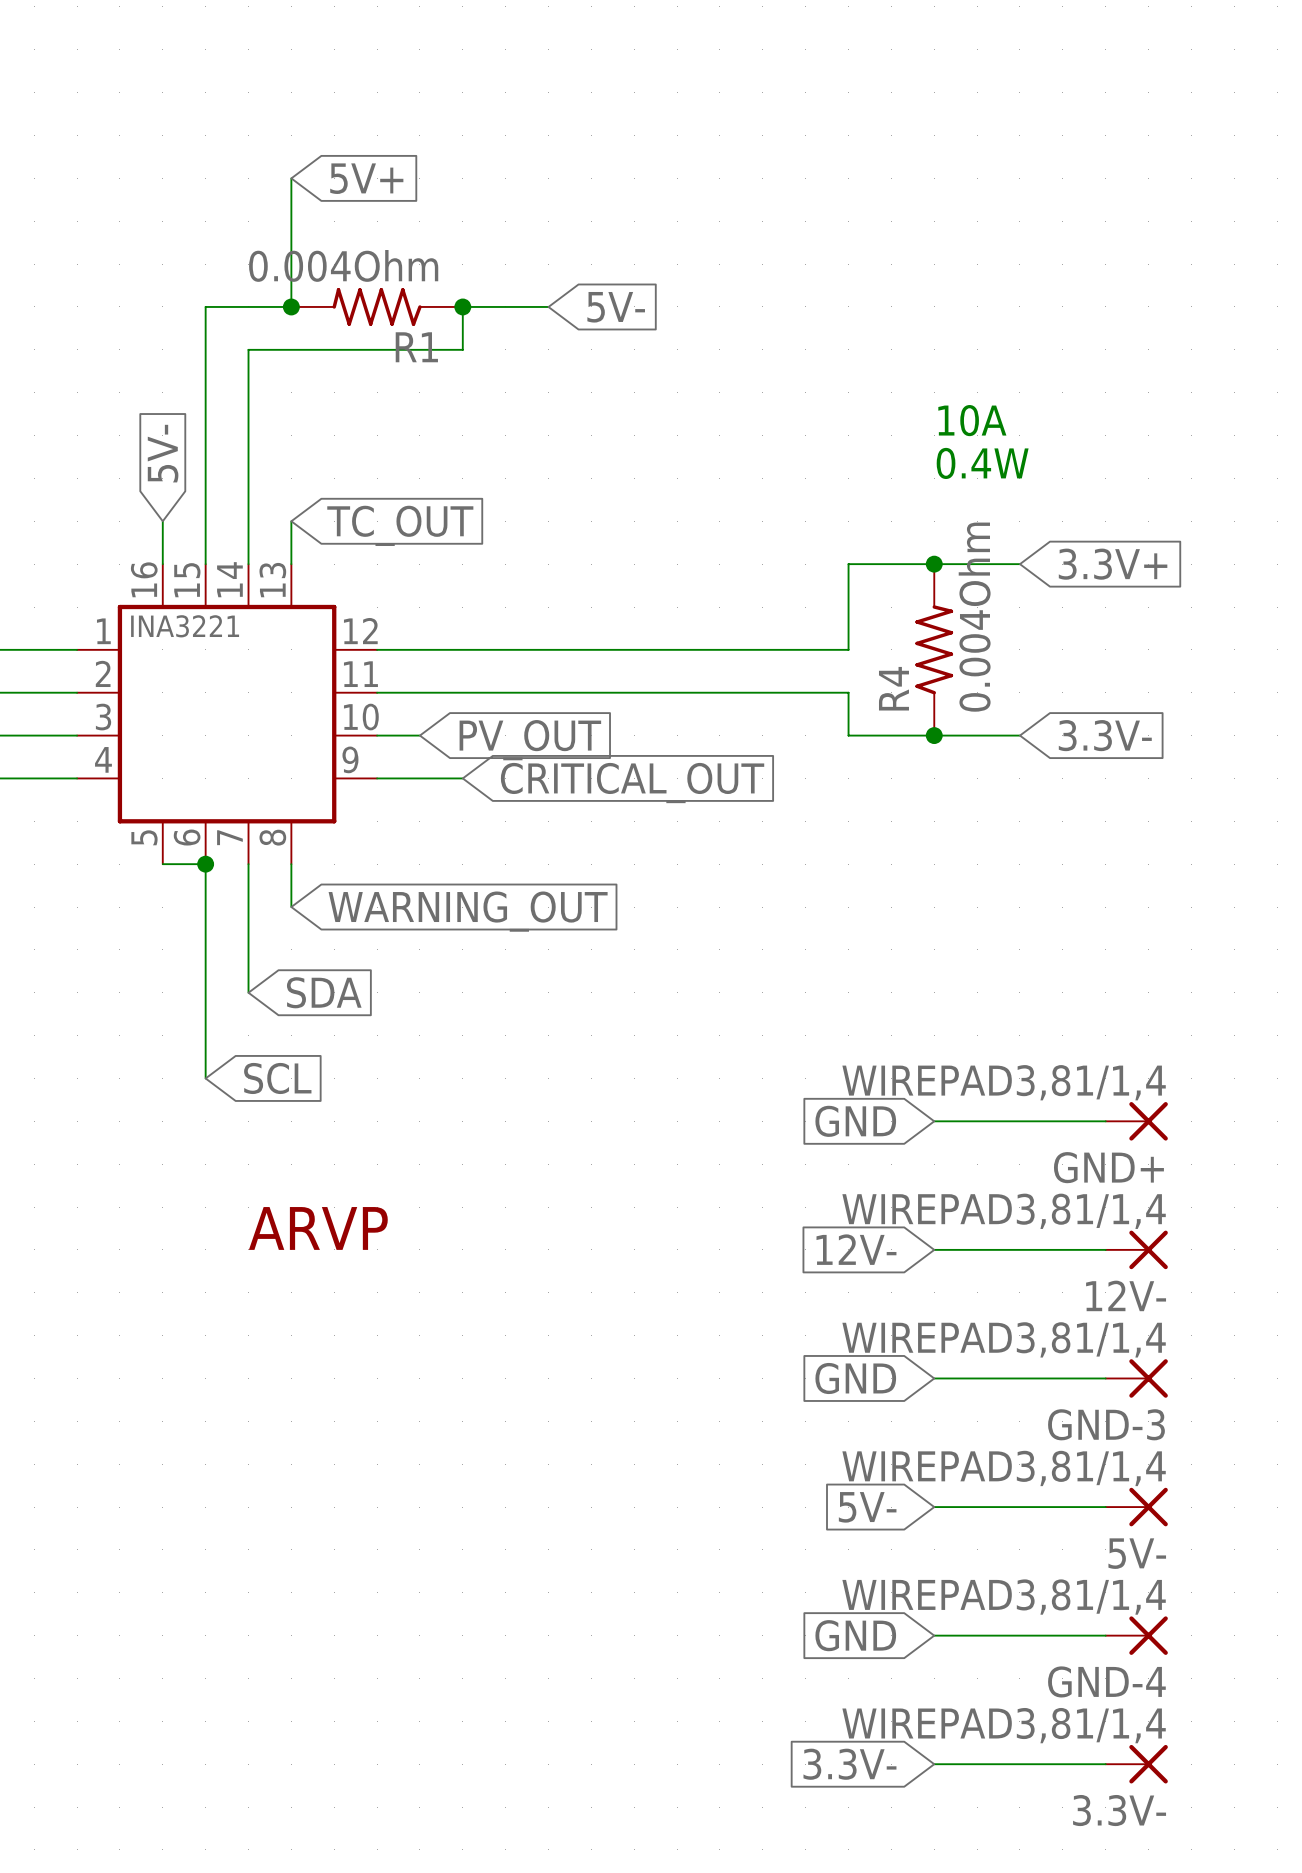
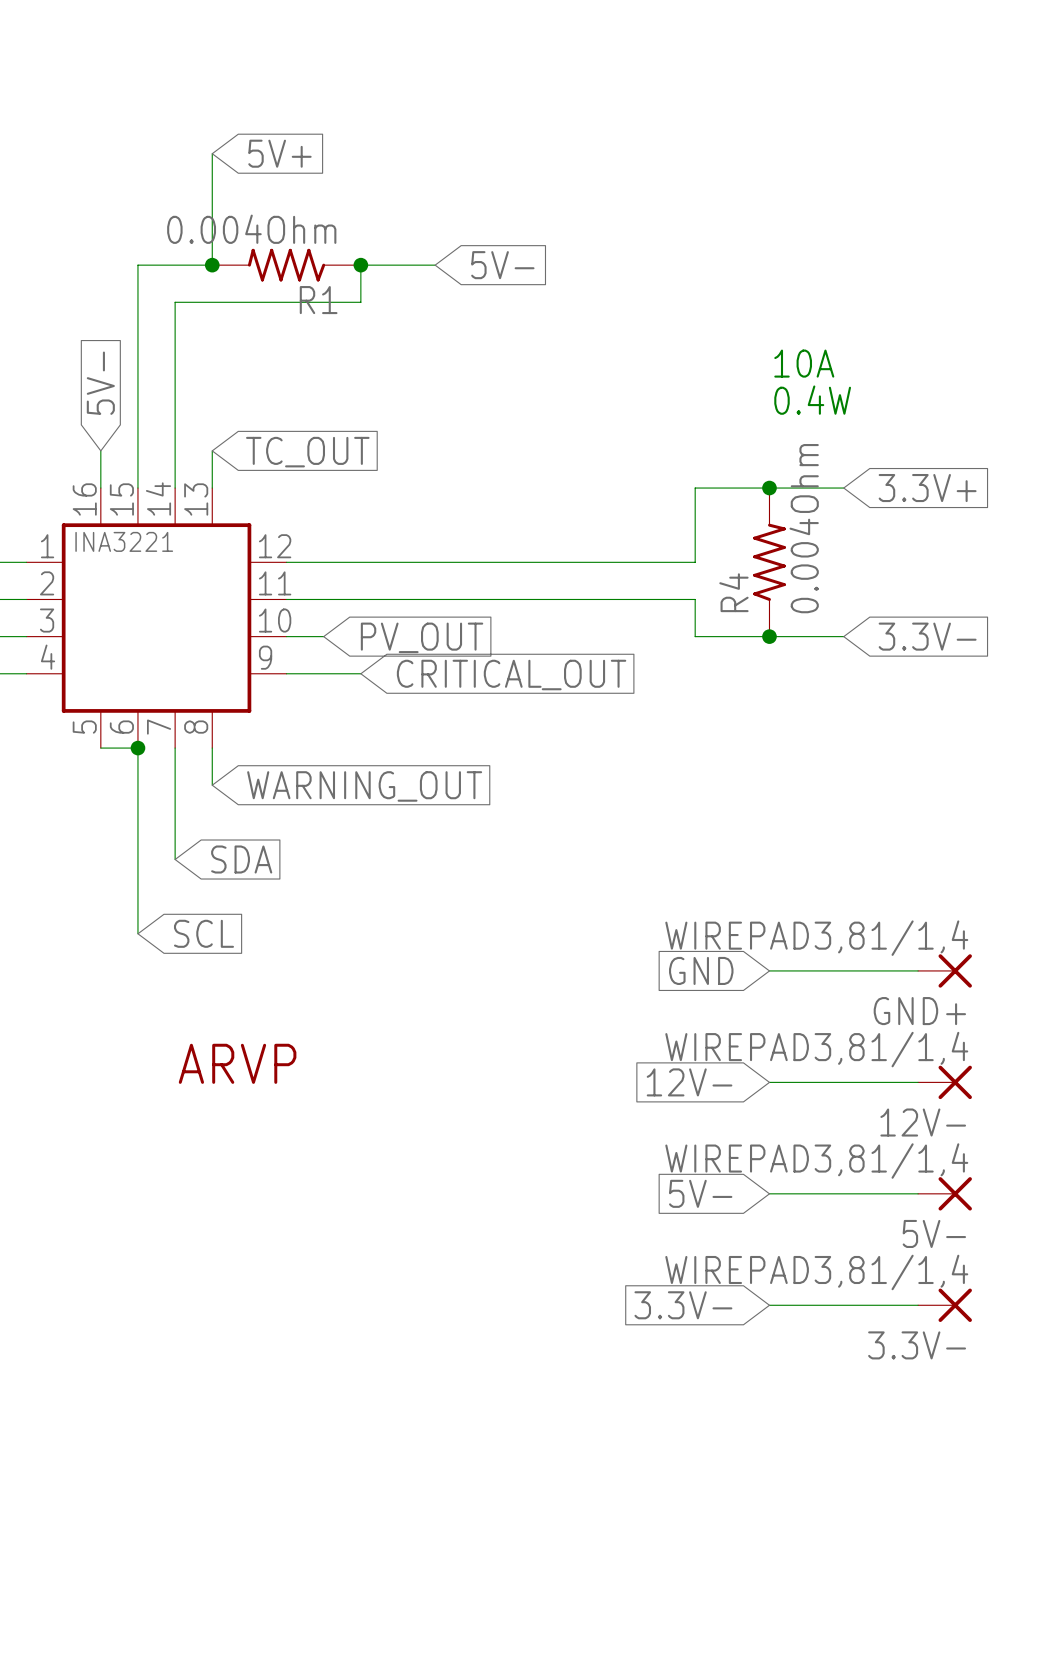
global label: GND (855, 1378) -> 5V- (700, 1193)
GND-3 name: GND-3 (1106, 1424) -> 5V- (934, 1233)
global label: 5V- (867, 1507) -> 3.3V- (683, 1305)
5V- name: 5V- (1137, 1553) -> 3.3V- (917, 1345)
global label: GND (855, 1635) -> none
wire: (934, 1635) (1105, 1635) -> none
GND-4: WIREPAD3,81/1,4 (1136, 1635) -> none
global label: 3.3V- (849, 1764) -> none
wire: (934, 1764) (1105, 1764) -> none
3.3V-: WIREPAD3,81/1,4 (1136, 1764) -> none

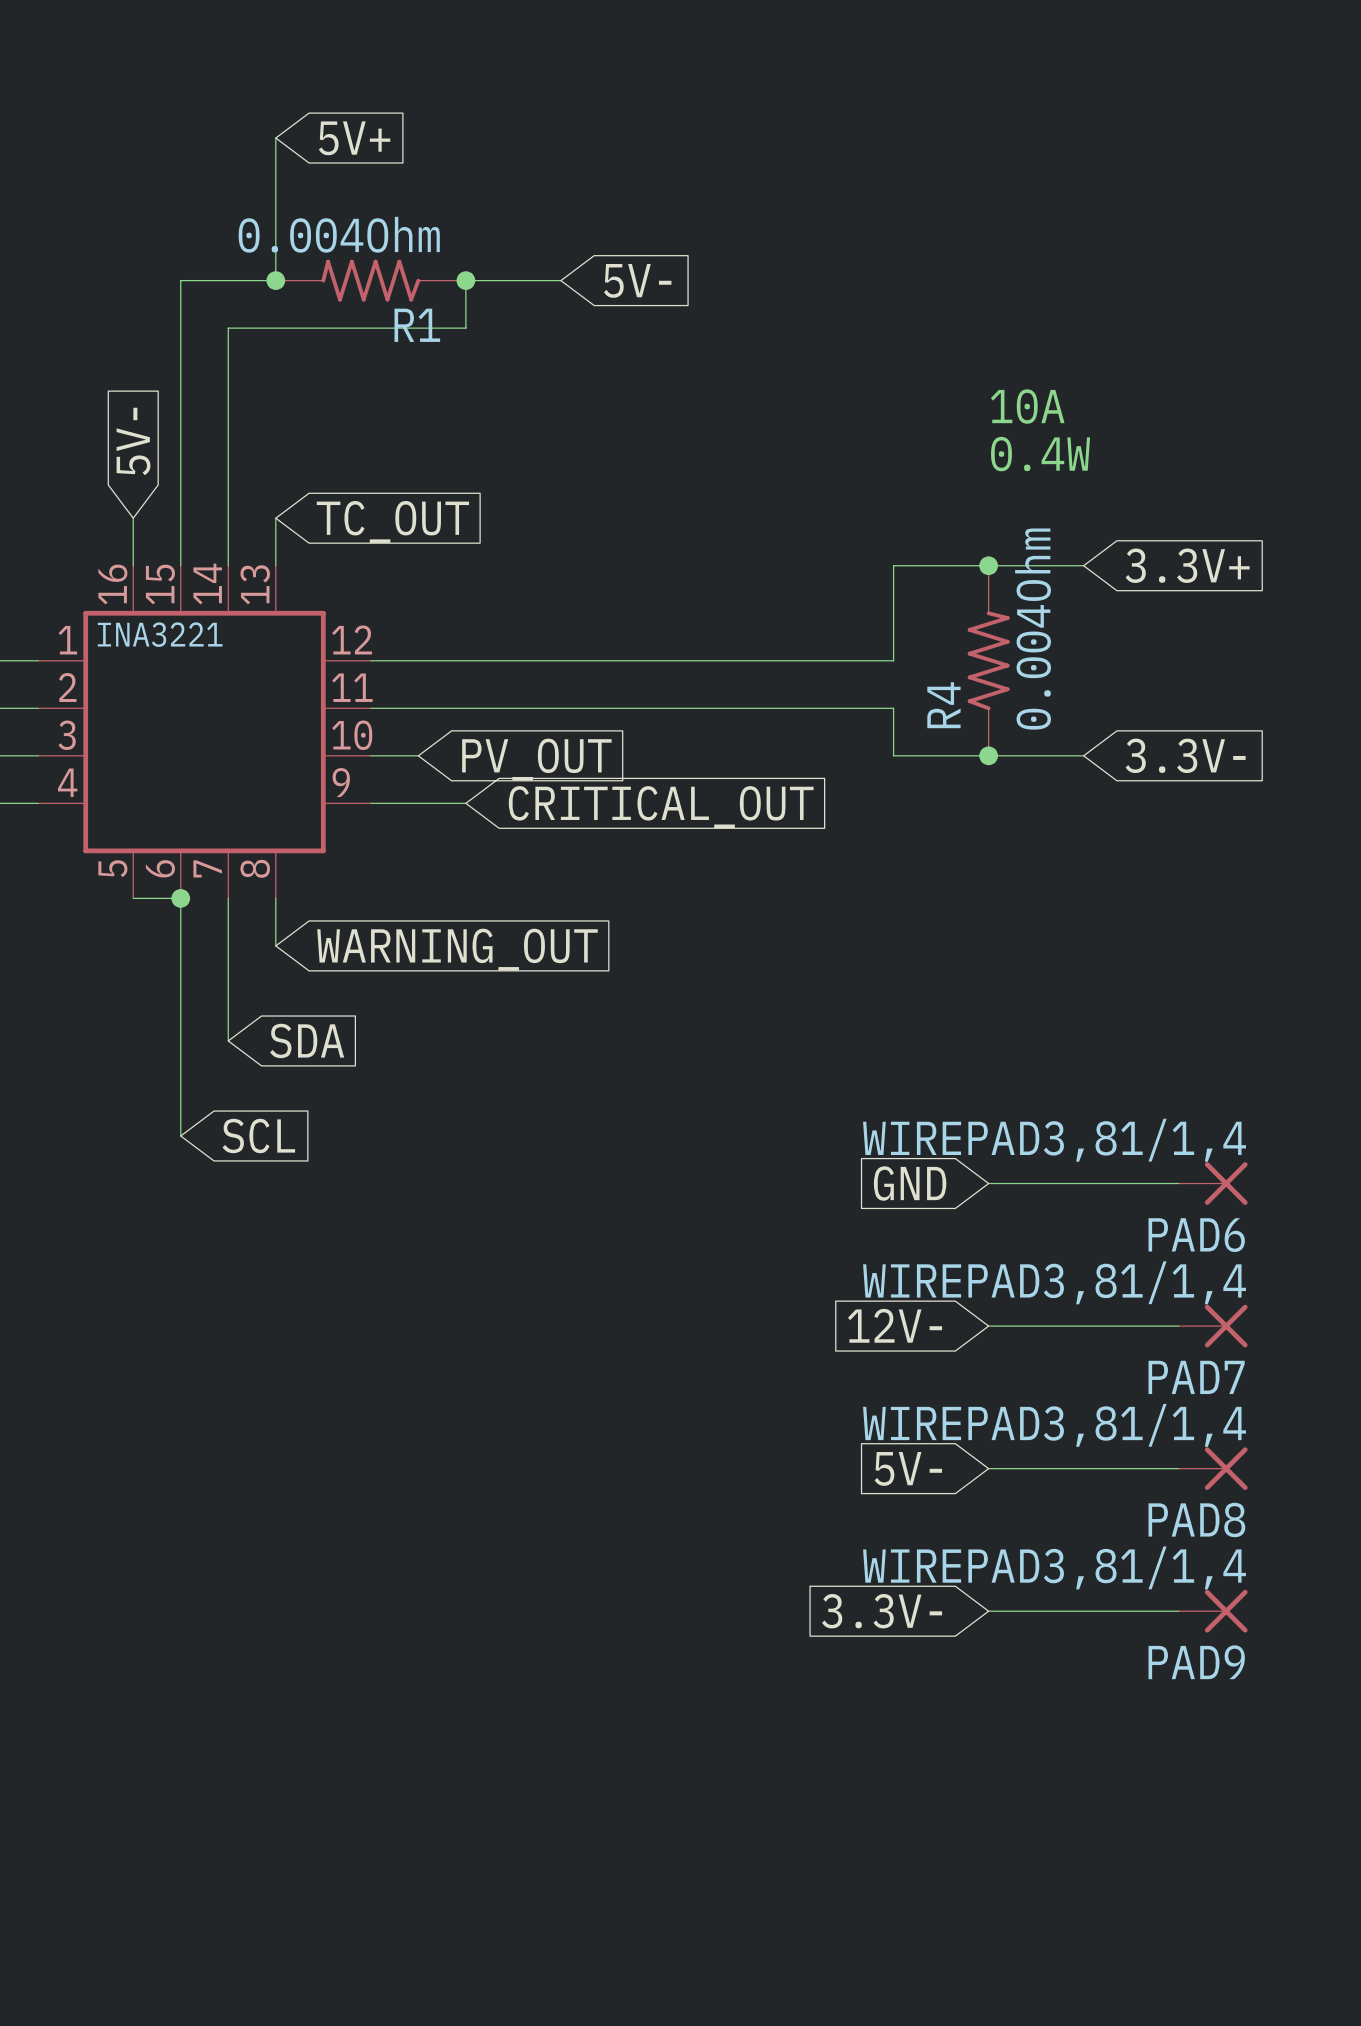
GND+ name: GND+ (919, 1011) -> PAD6 (1196, 1235)
part: (237, 1063) -> none
12V- name: 12V- (923, 1122) -> PAD7 (1196, 1377)
5V- name: 5V- (934, 1233) -> PAD8 (1196, 1519)
3.3V- name: 3.3V- (917, 1345) -> PAD9 (1196, 1662)

